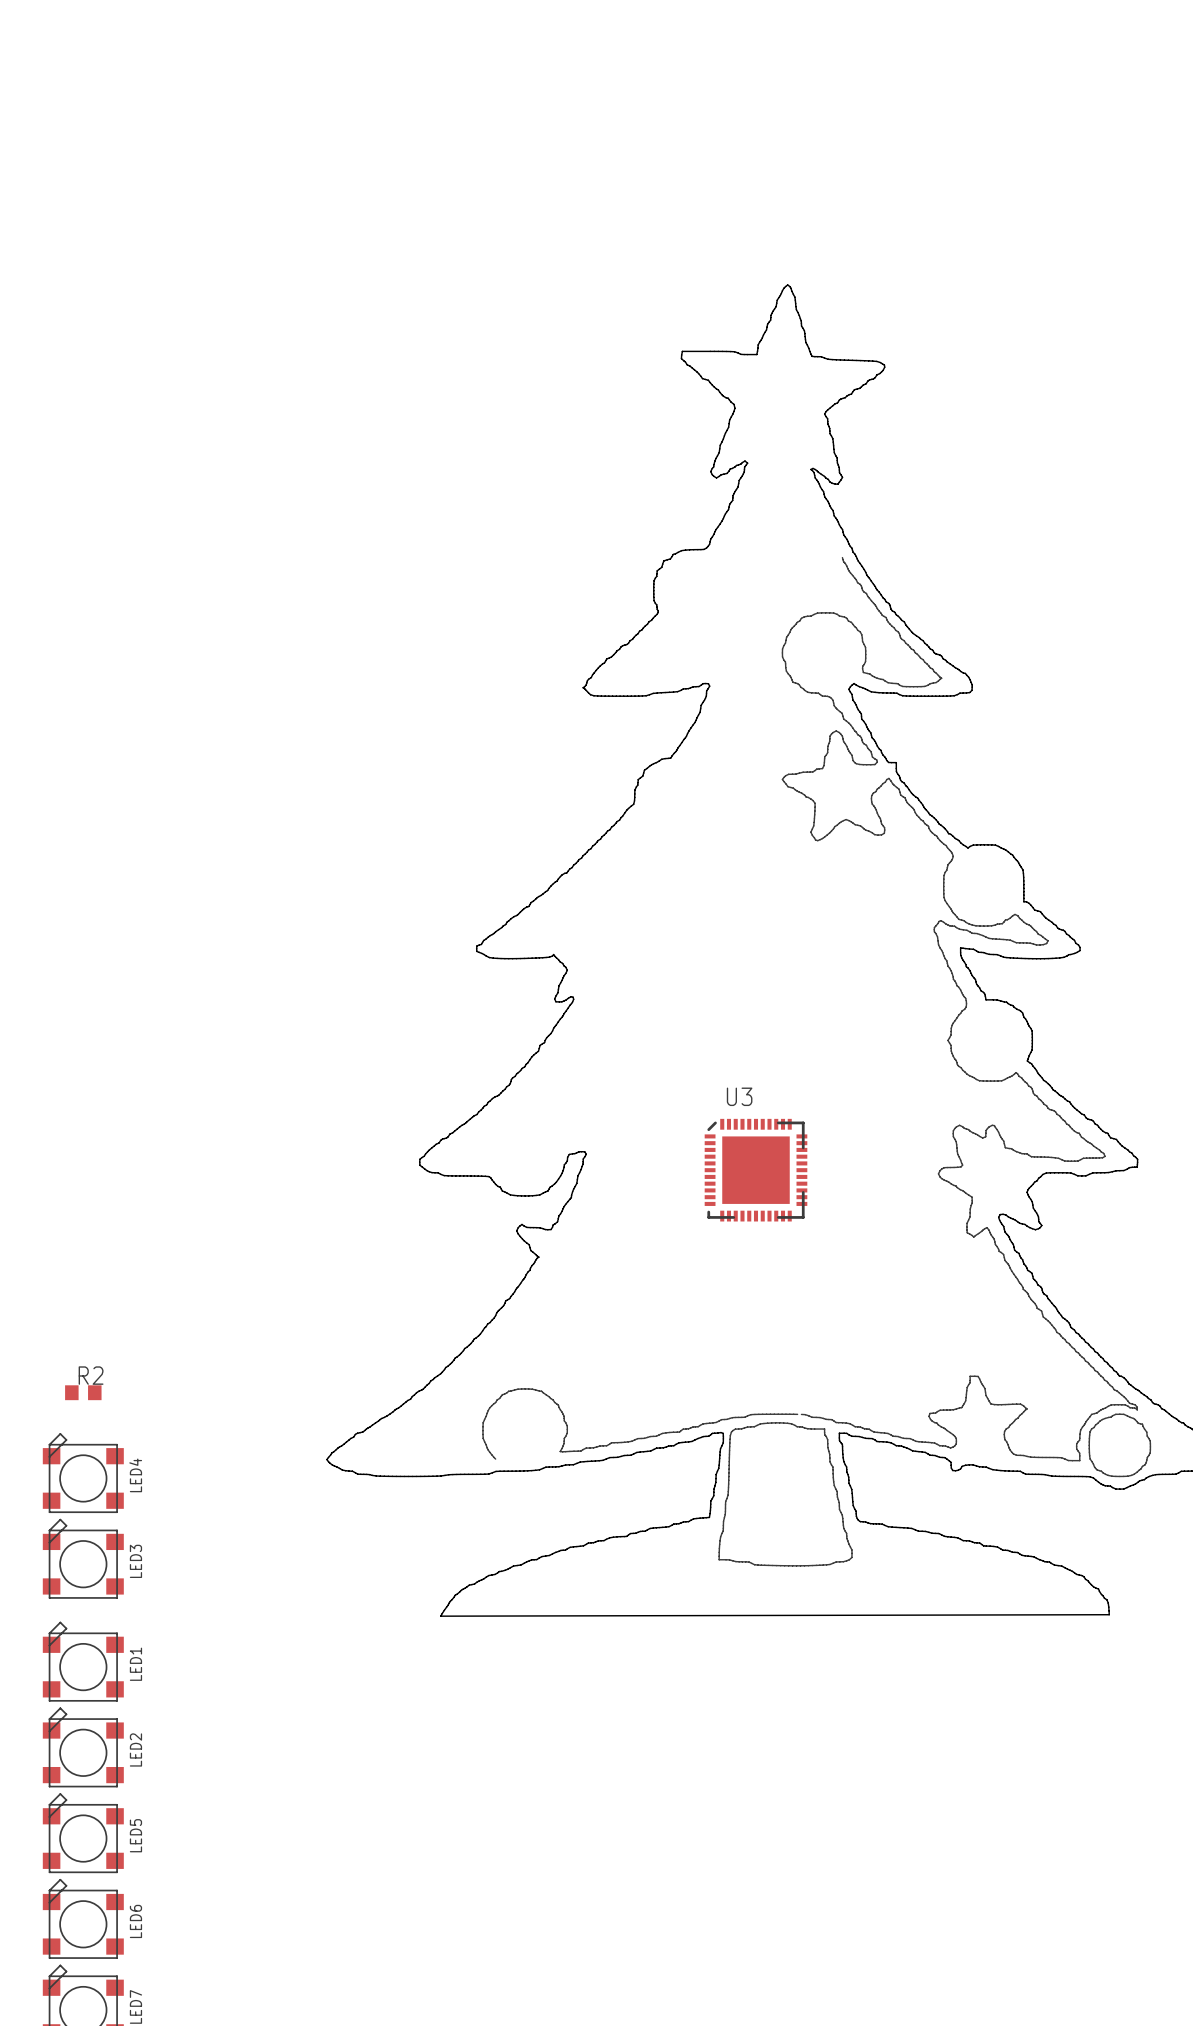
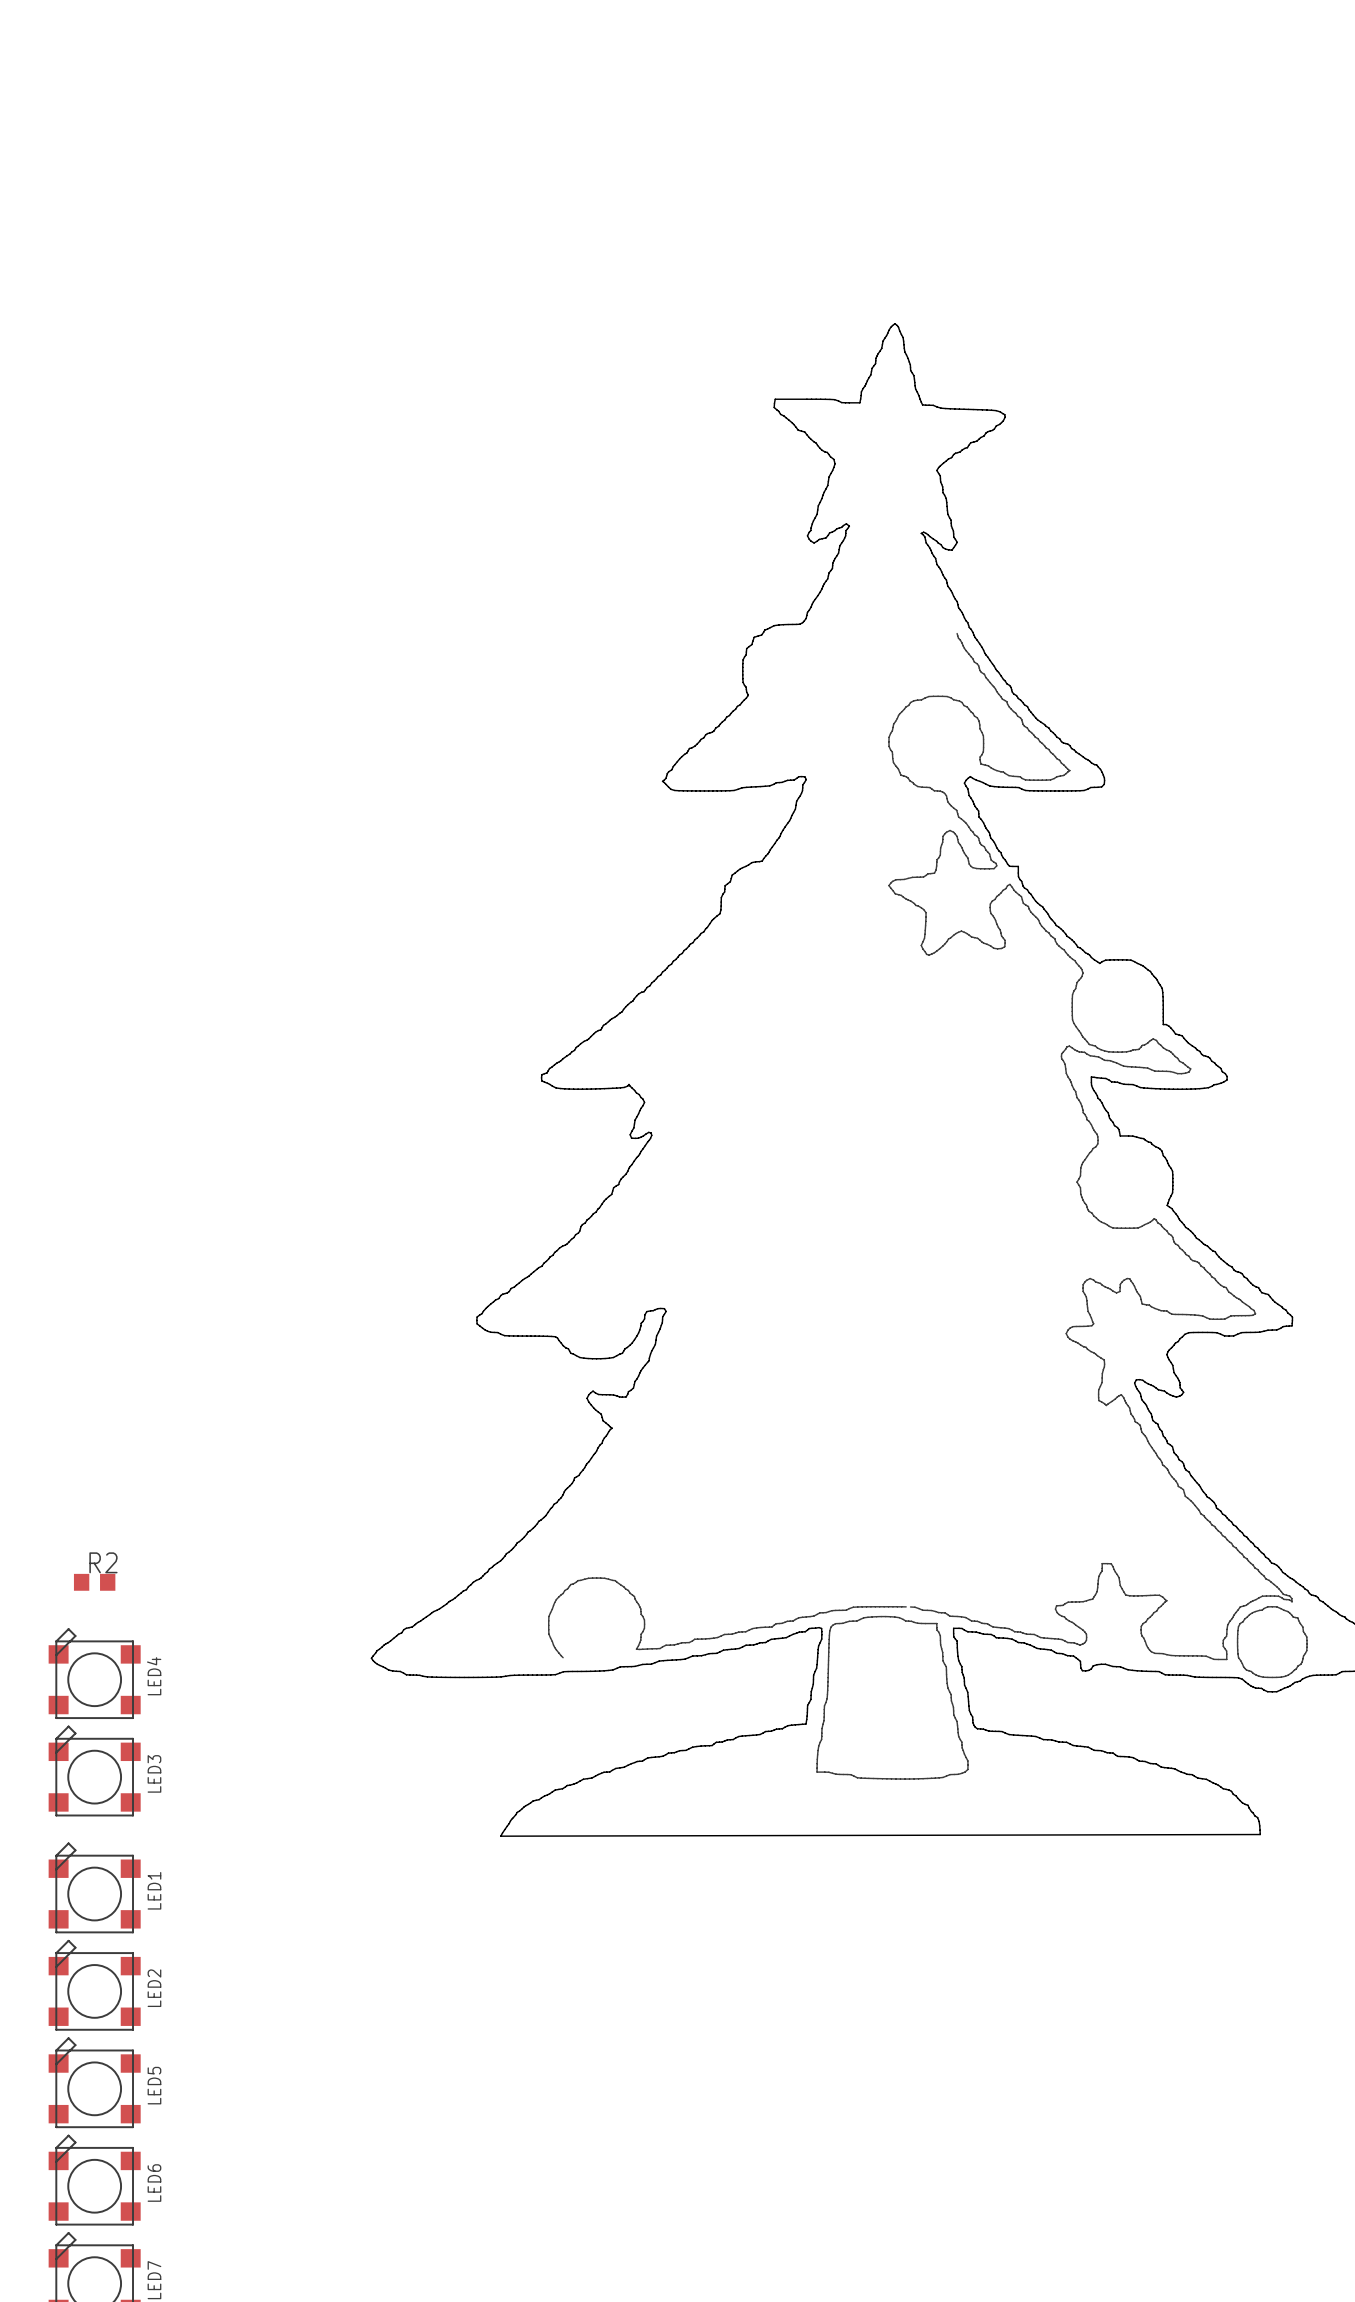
U3: (755, 1170) -> none

